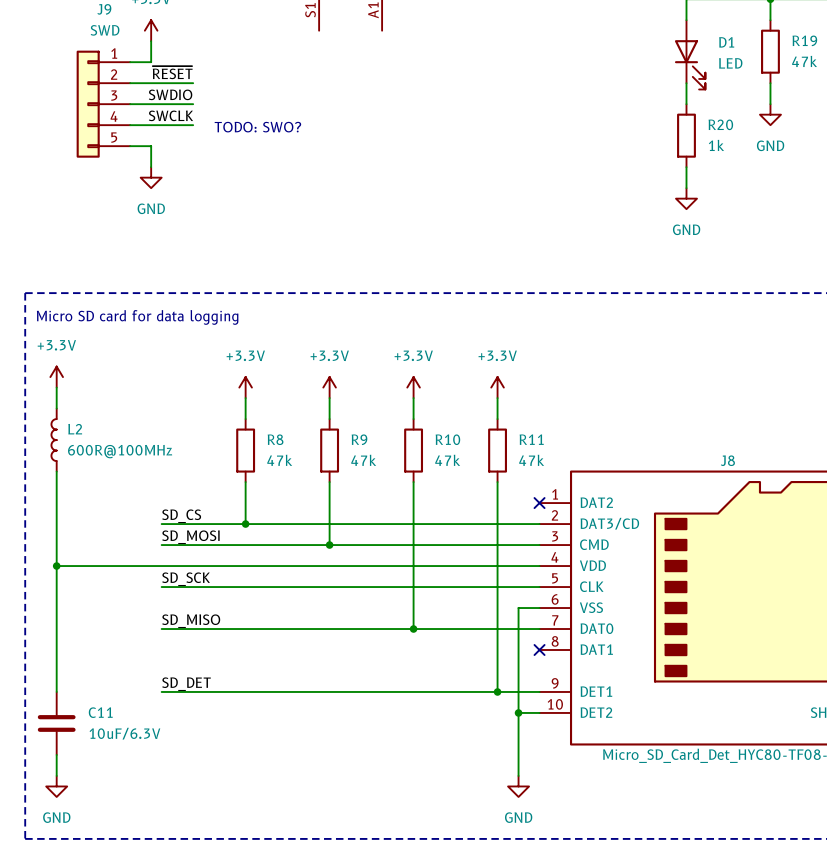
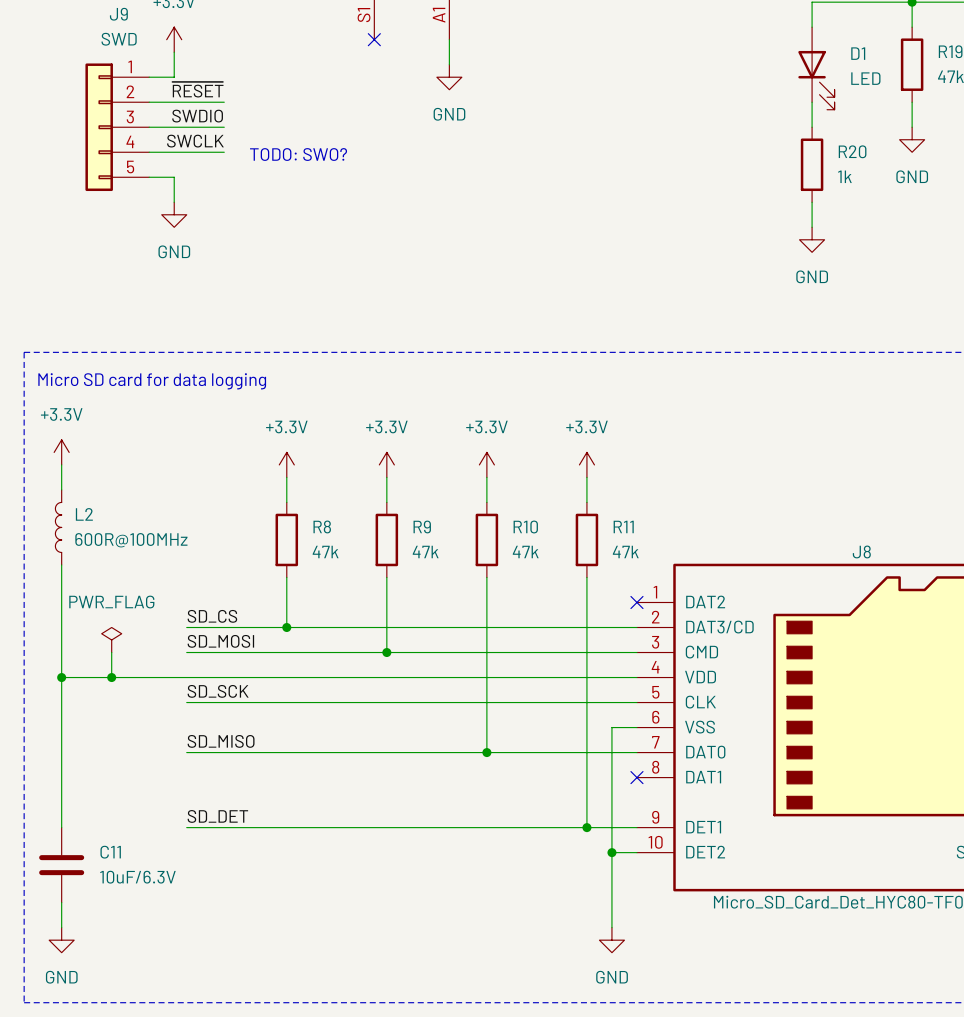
no-connect mark: none -> (374, 39)
wire: none -> (449, 39) (449, 64)
power symbol: none -> GND (449, 77)
power symbol: none -> PWR_FLAG (111, 640)
wire: none -> (111, 652) (111, 677)
junction: none -> (111, 677)

